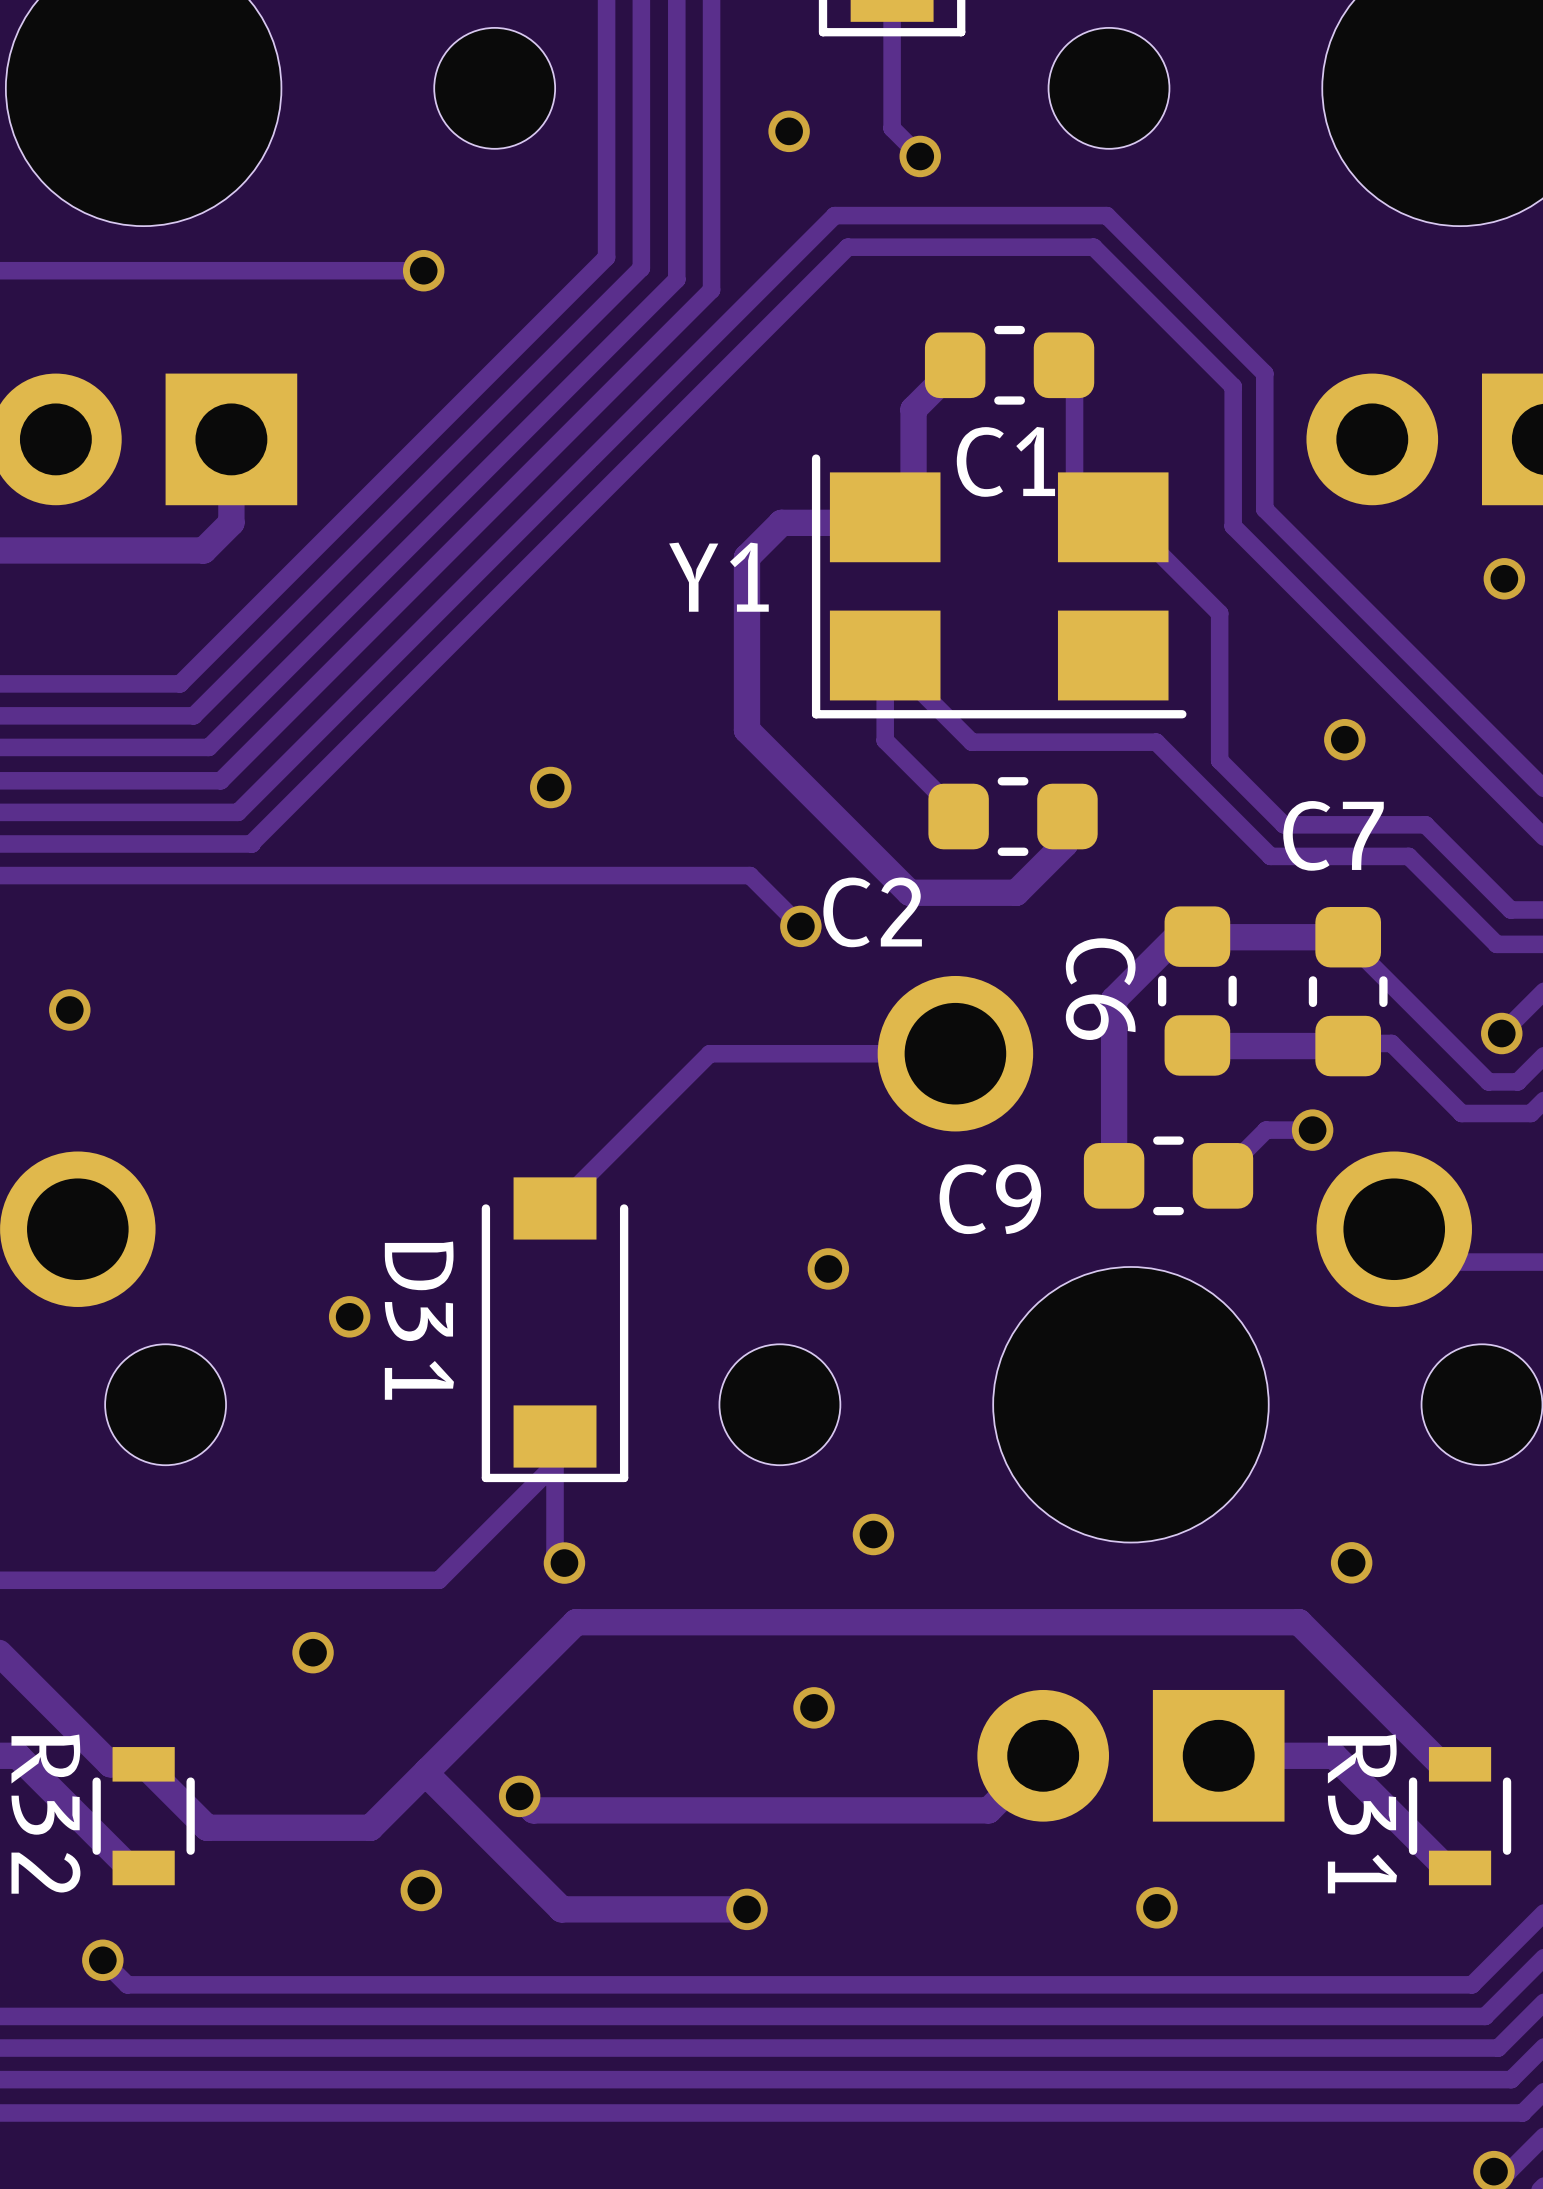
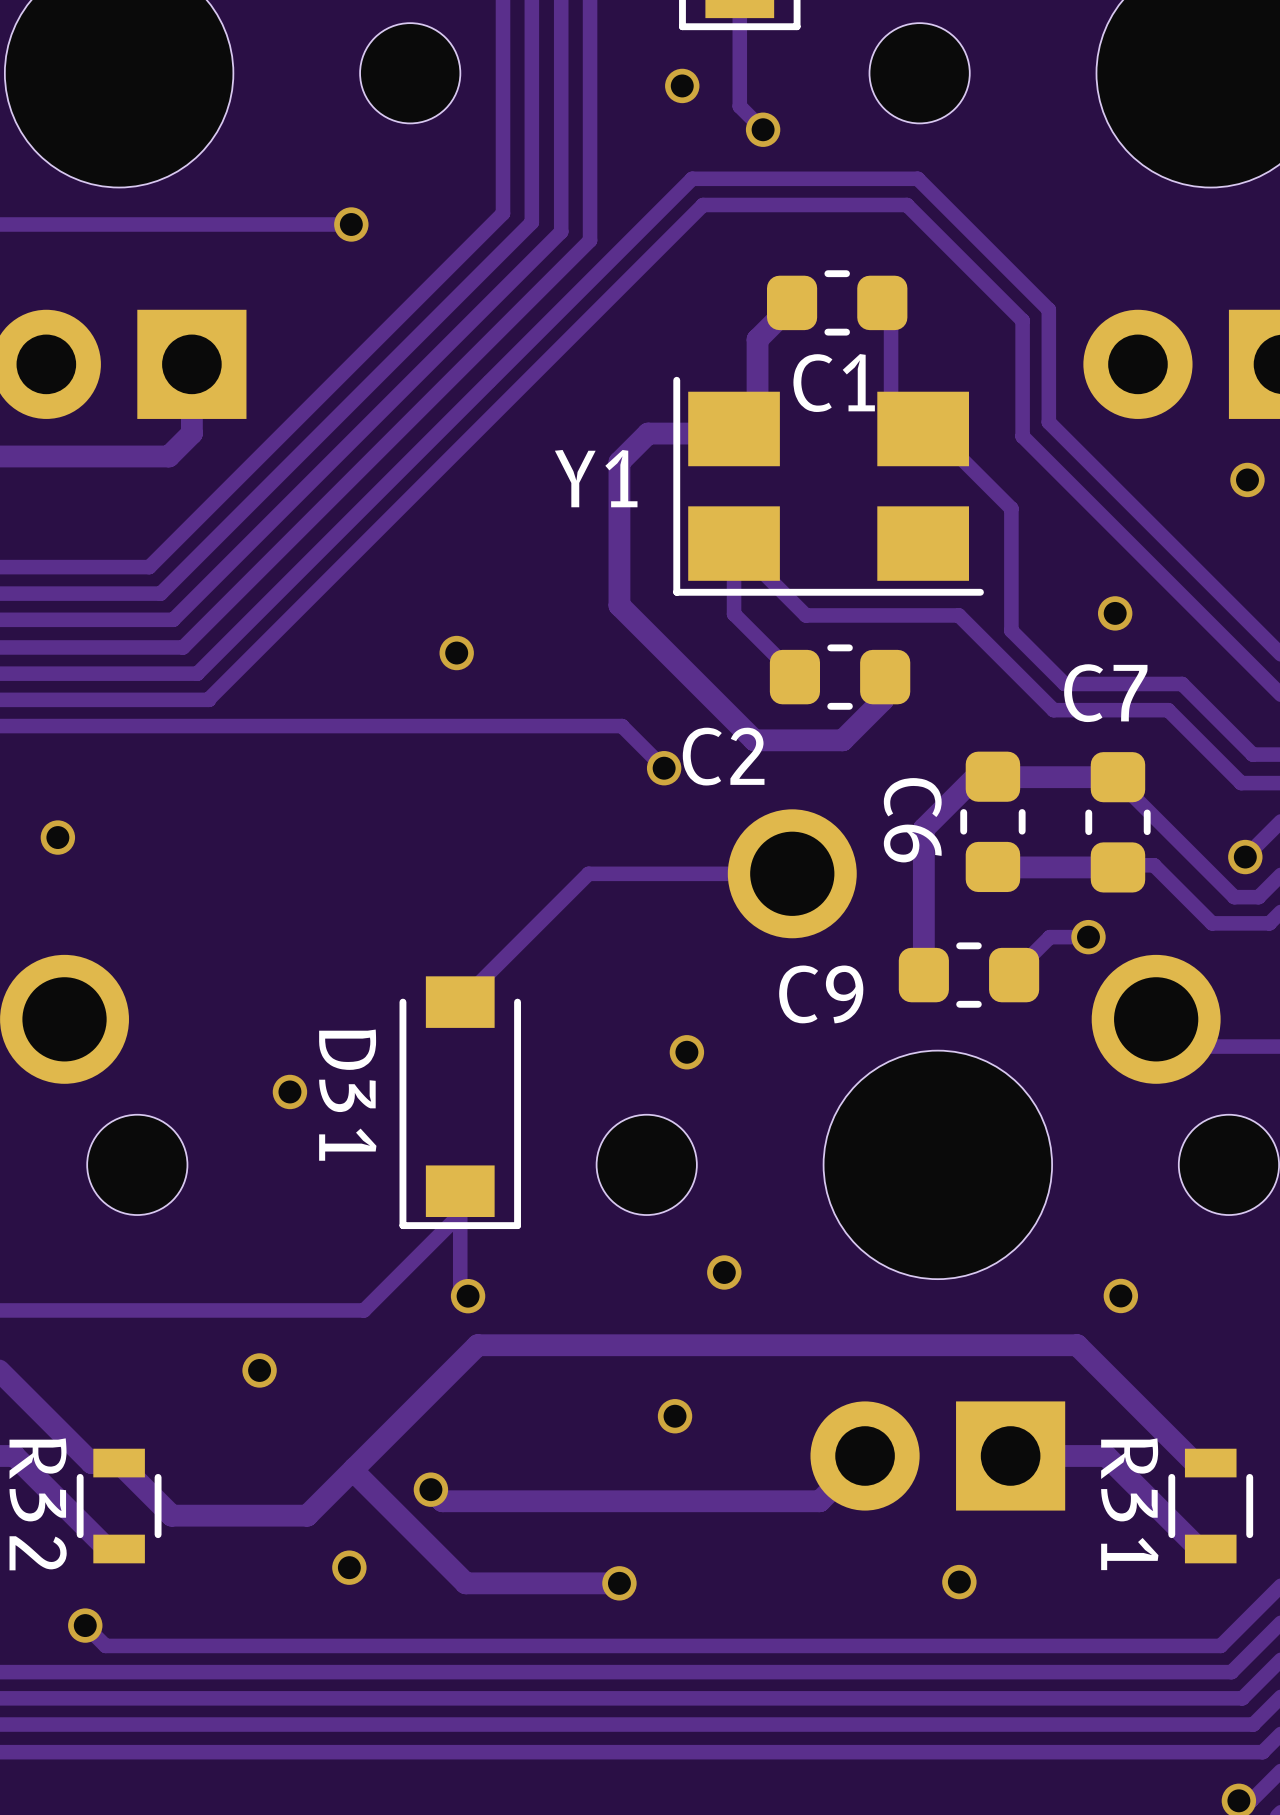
via position: (789, 131) -> (682, 85)

